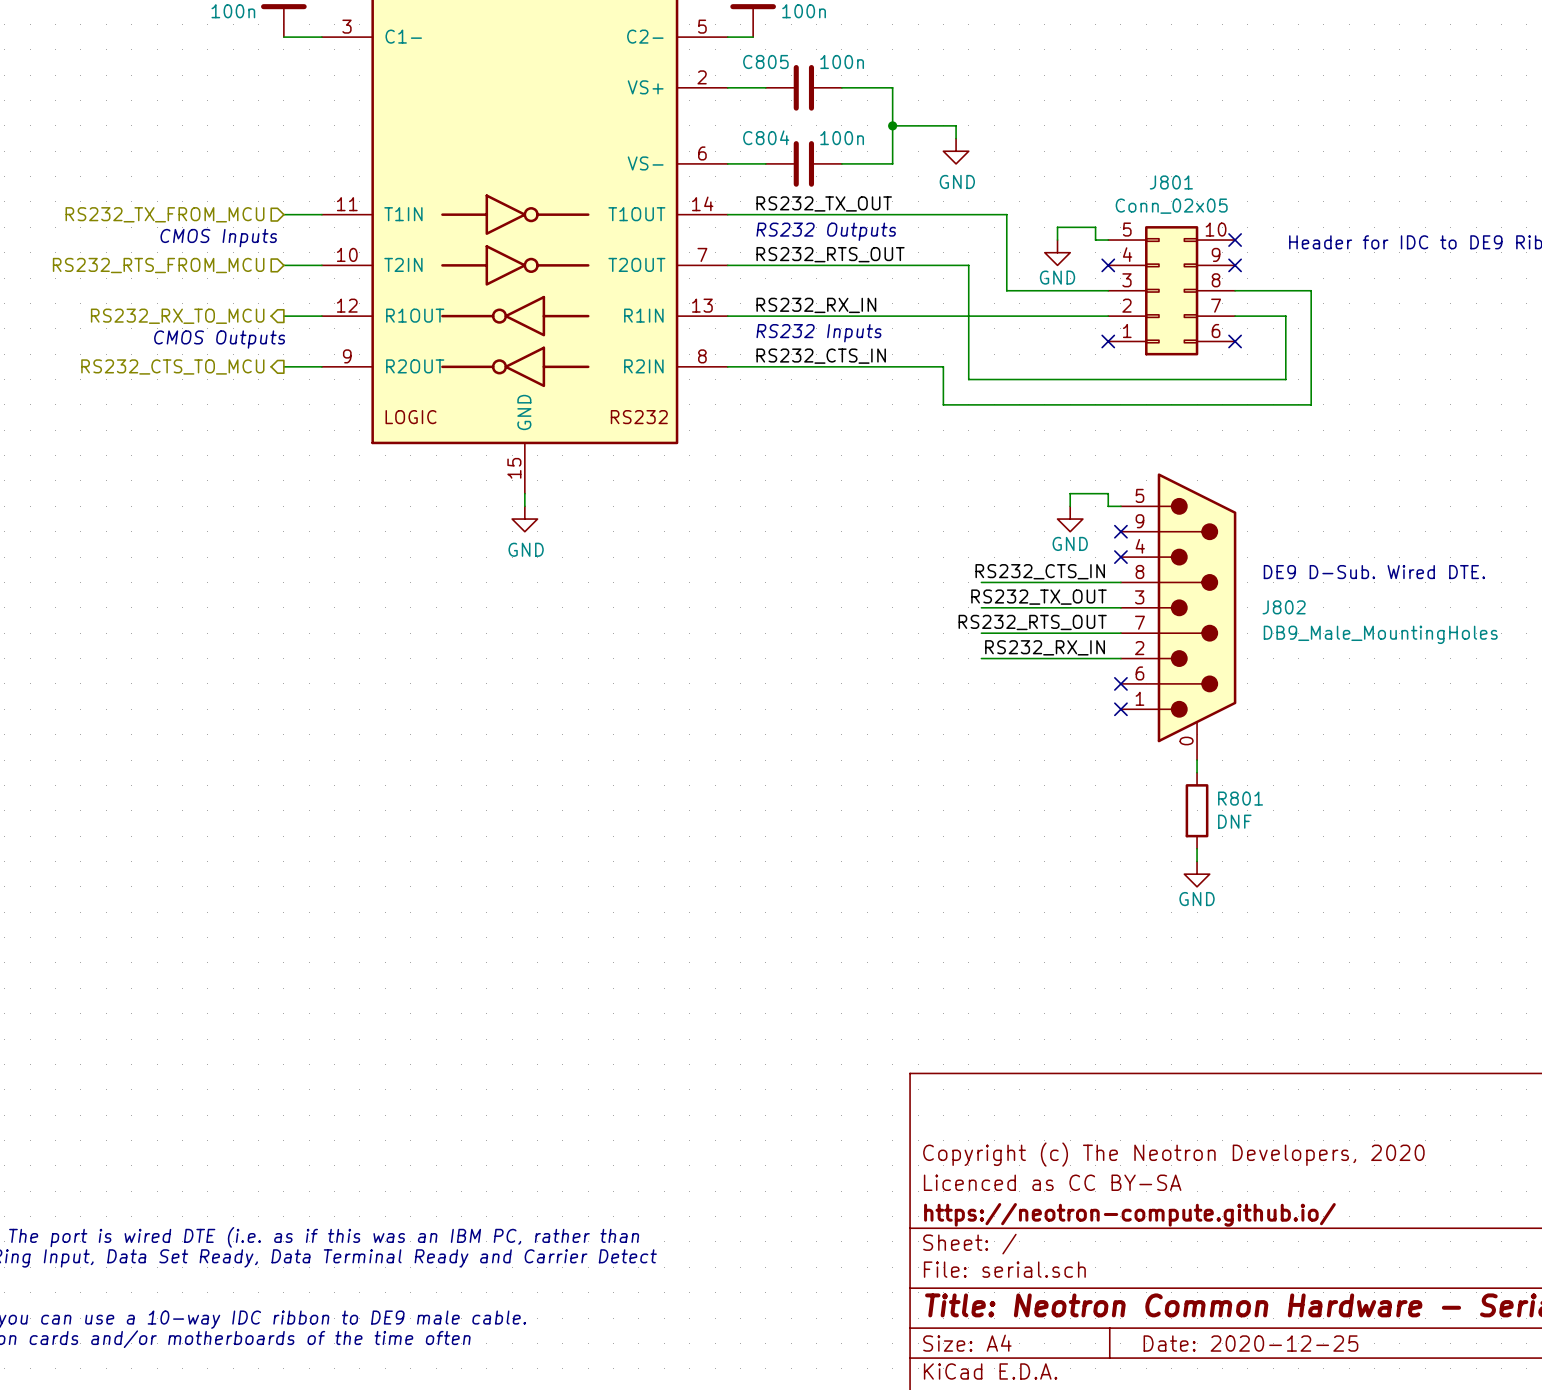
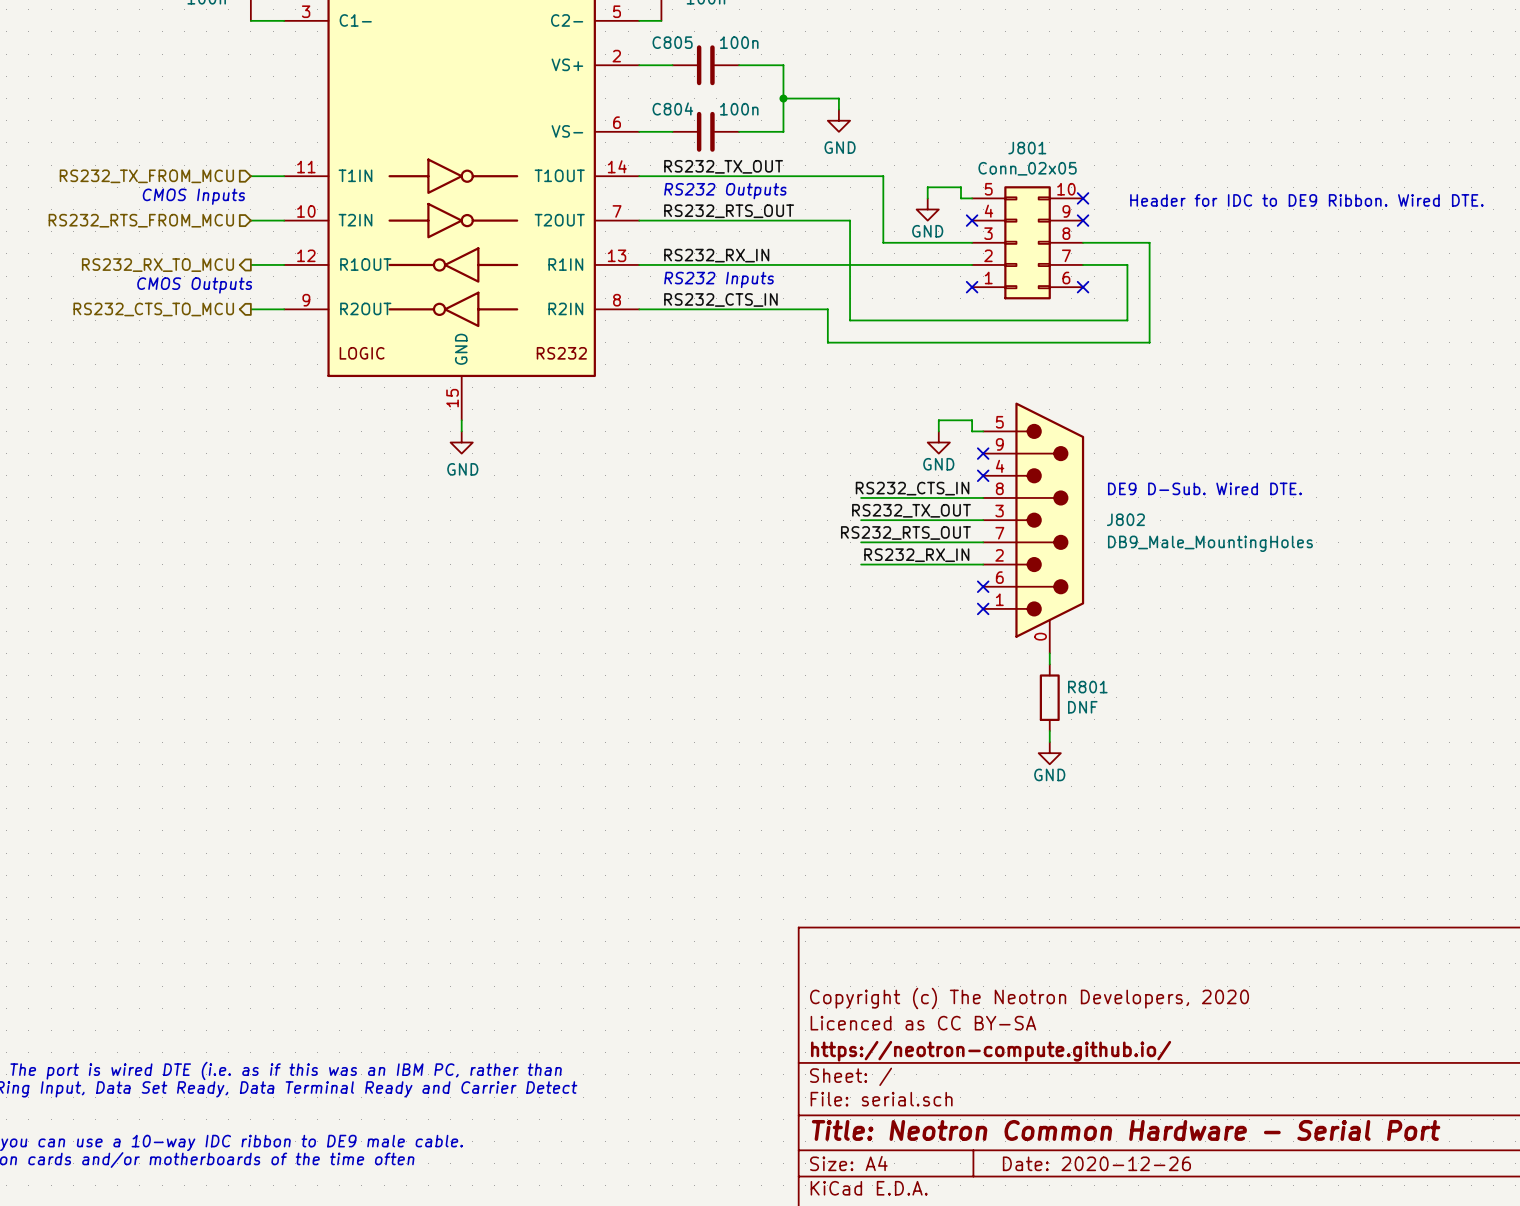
title block: Date: 2020-12-25 (1250, 1343) -> Date: 2020-12-26 (1096, 1163)

